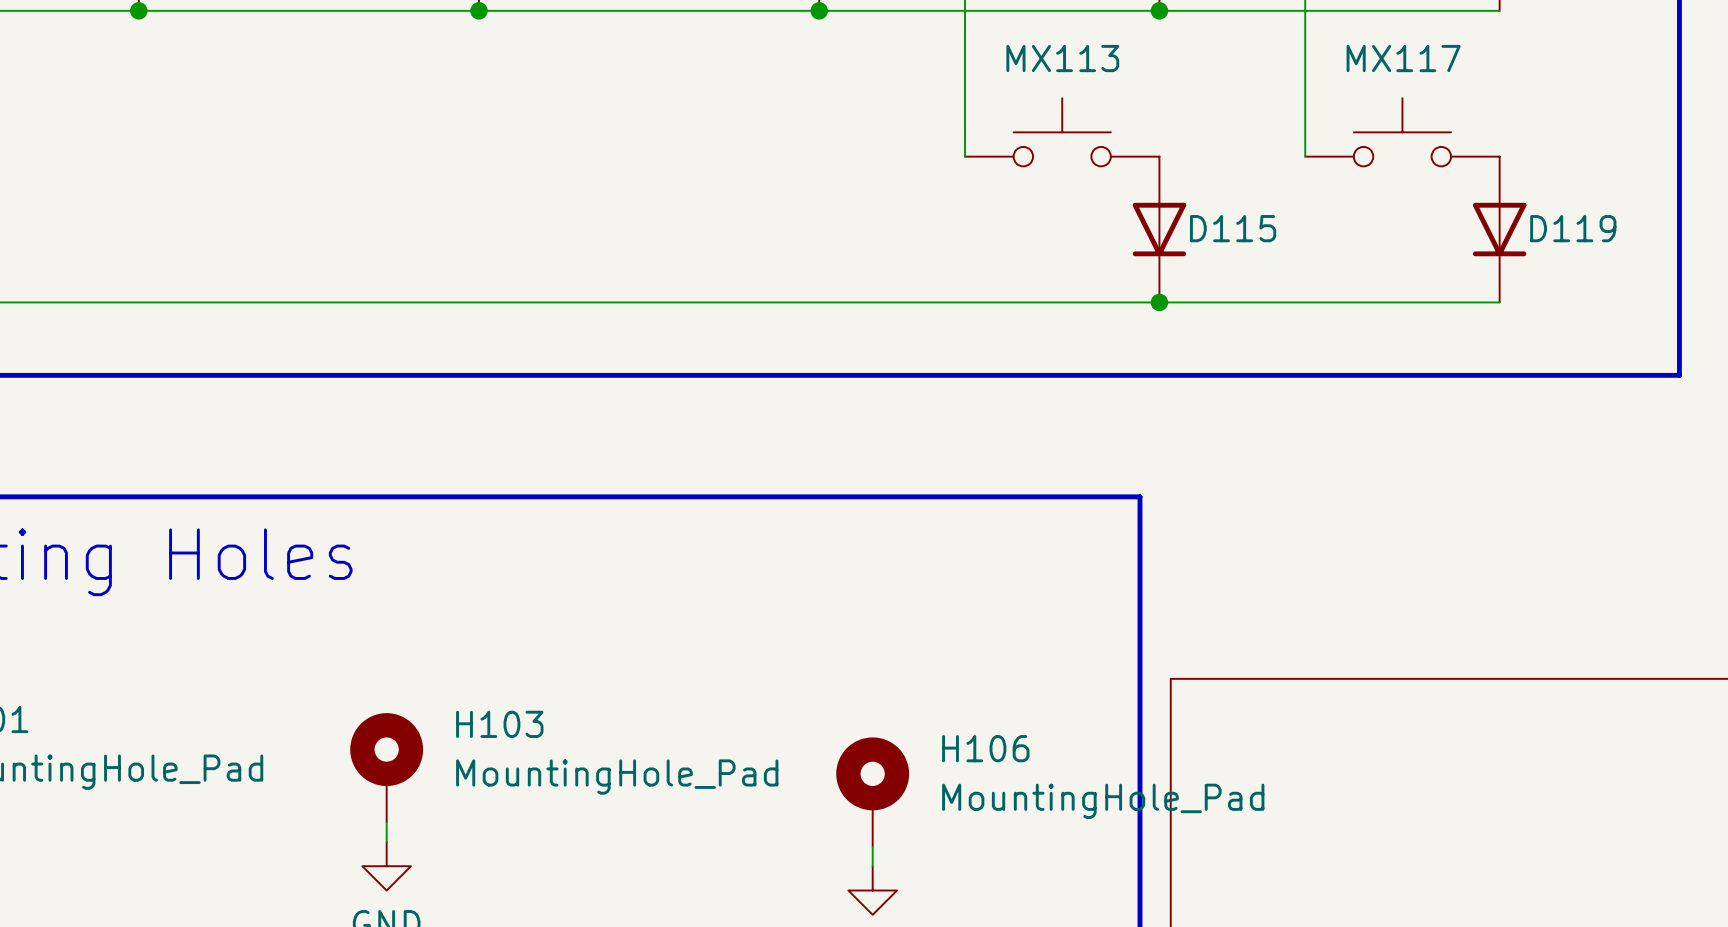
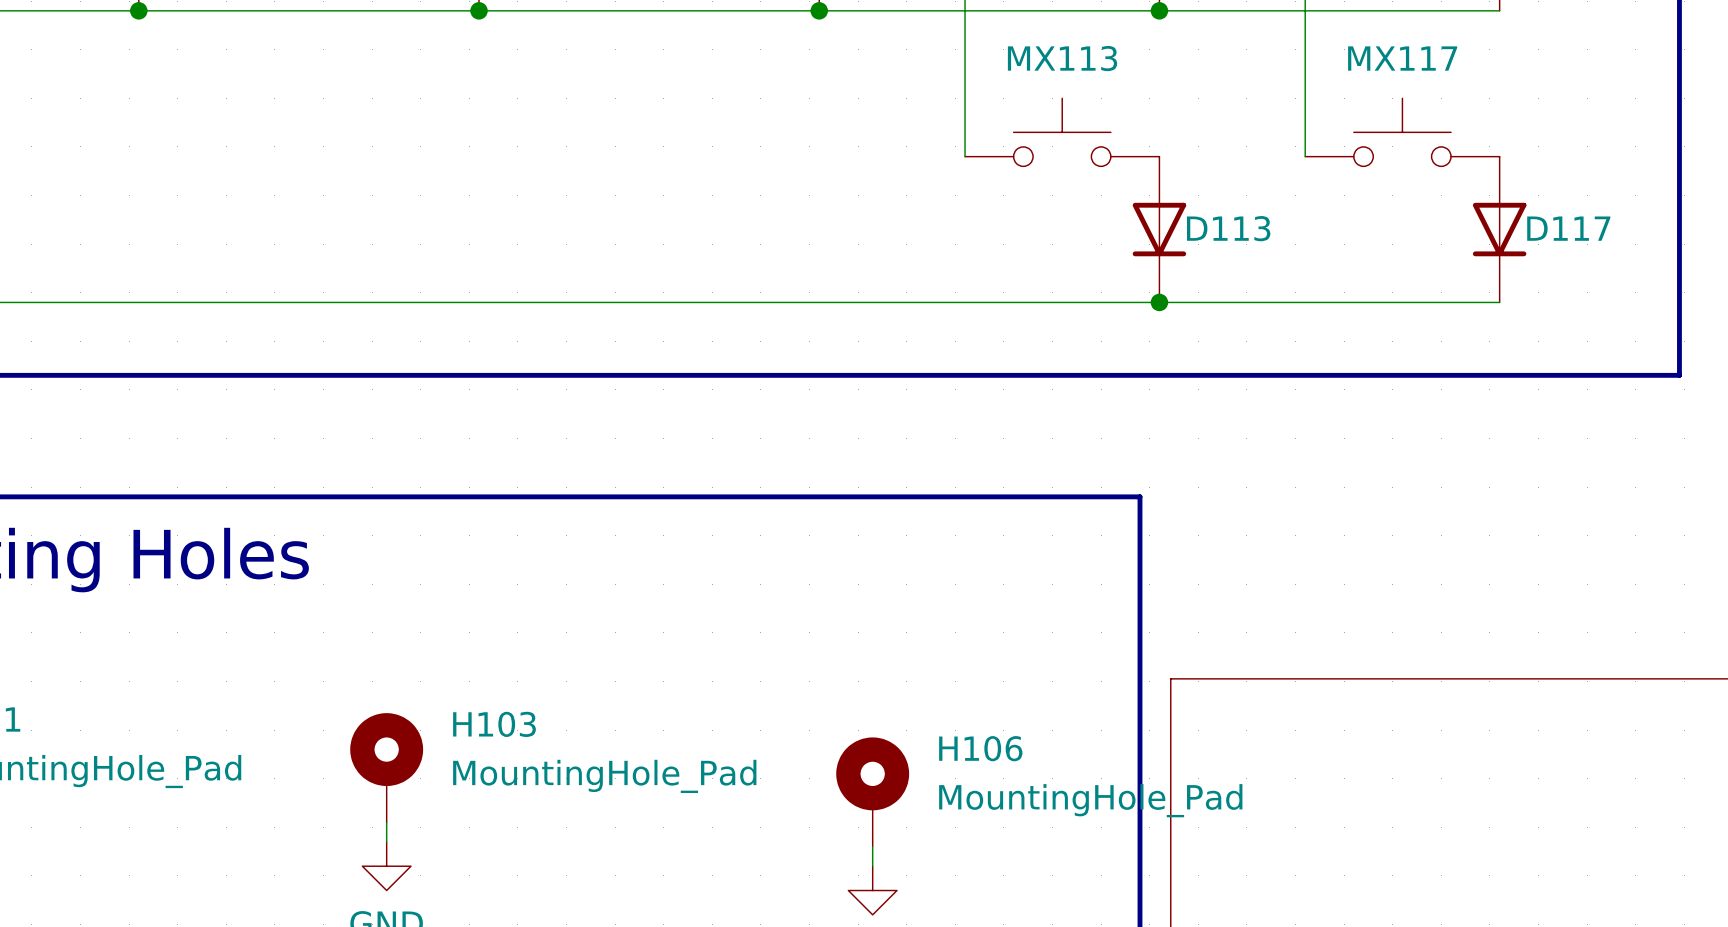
D115 name: D115 (1233, 228) -> D113 (1228, 228)
D119 name: D119 (1573, 228) -> D117 (1568, 228)

